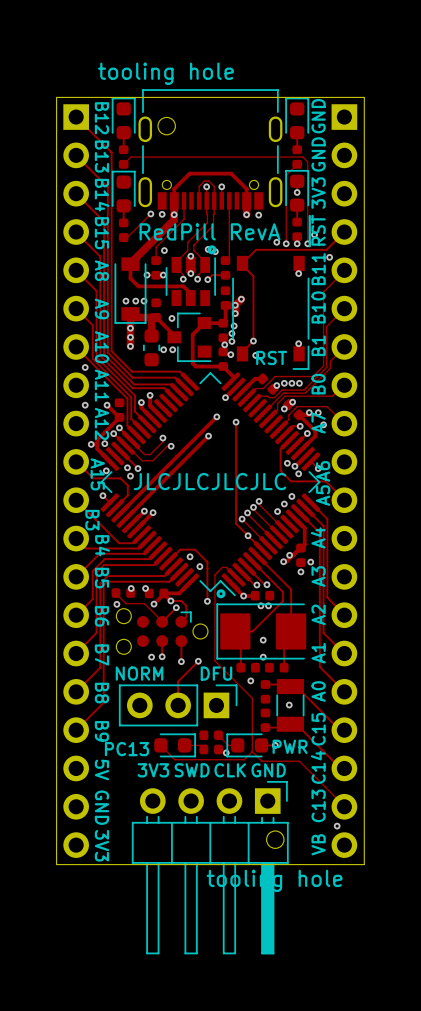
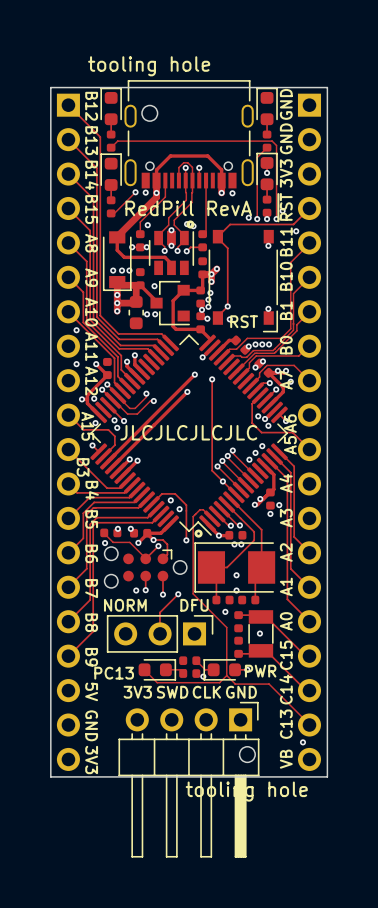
track: none -> (117, 303) (136, 303)

